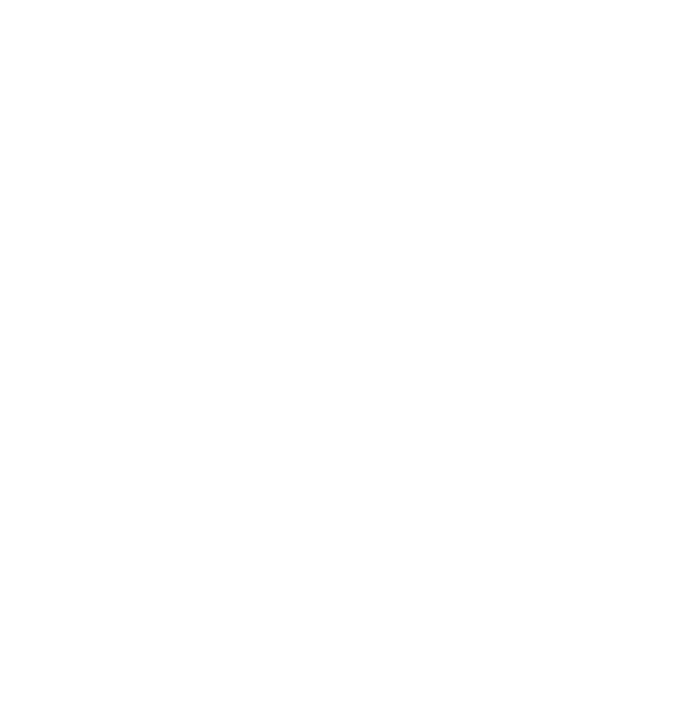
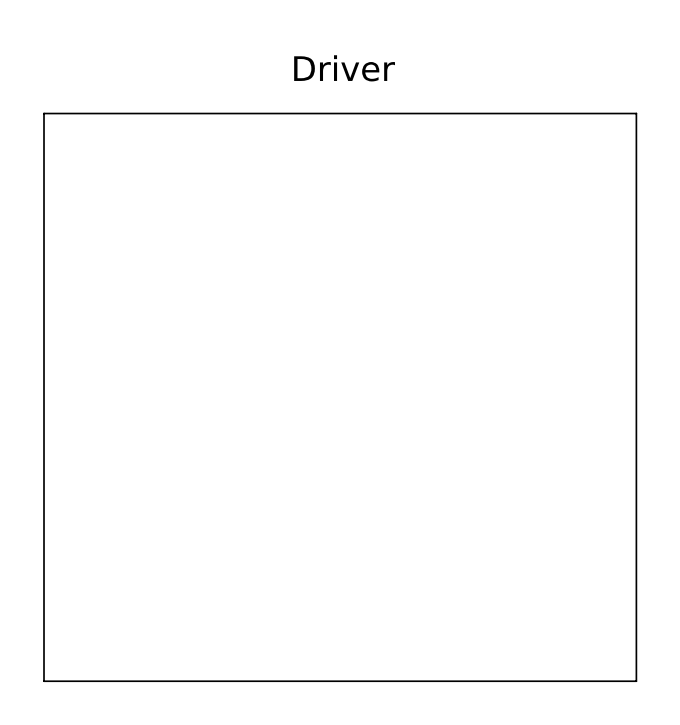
text: none -> Driver (344, 68)
line: none -> (44, 113) (636, 113) (636, 681) (44, 681) (44, 113)

